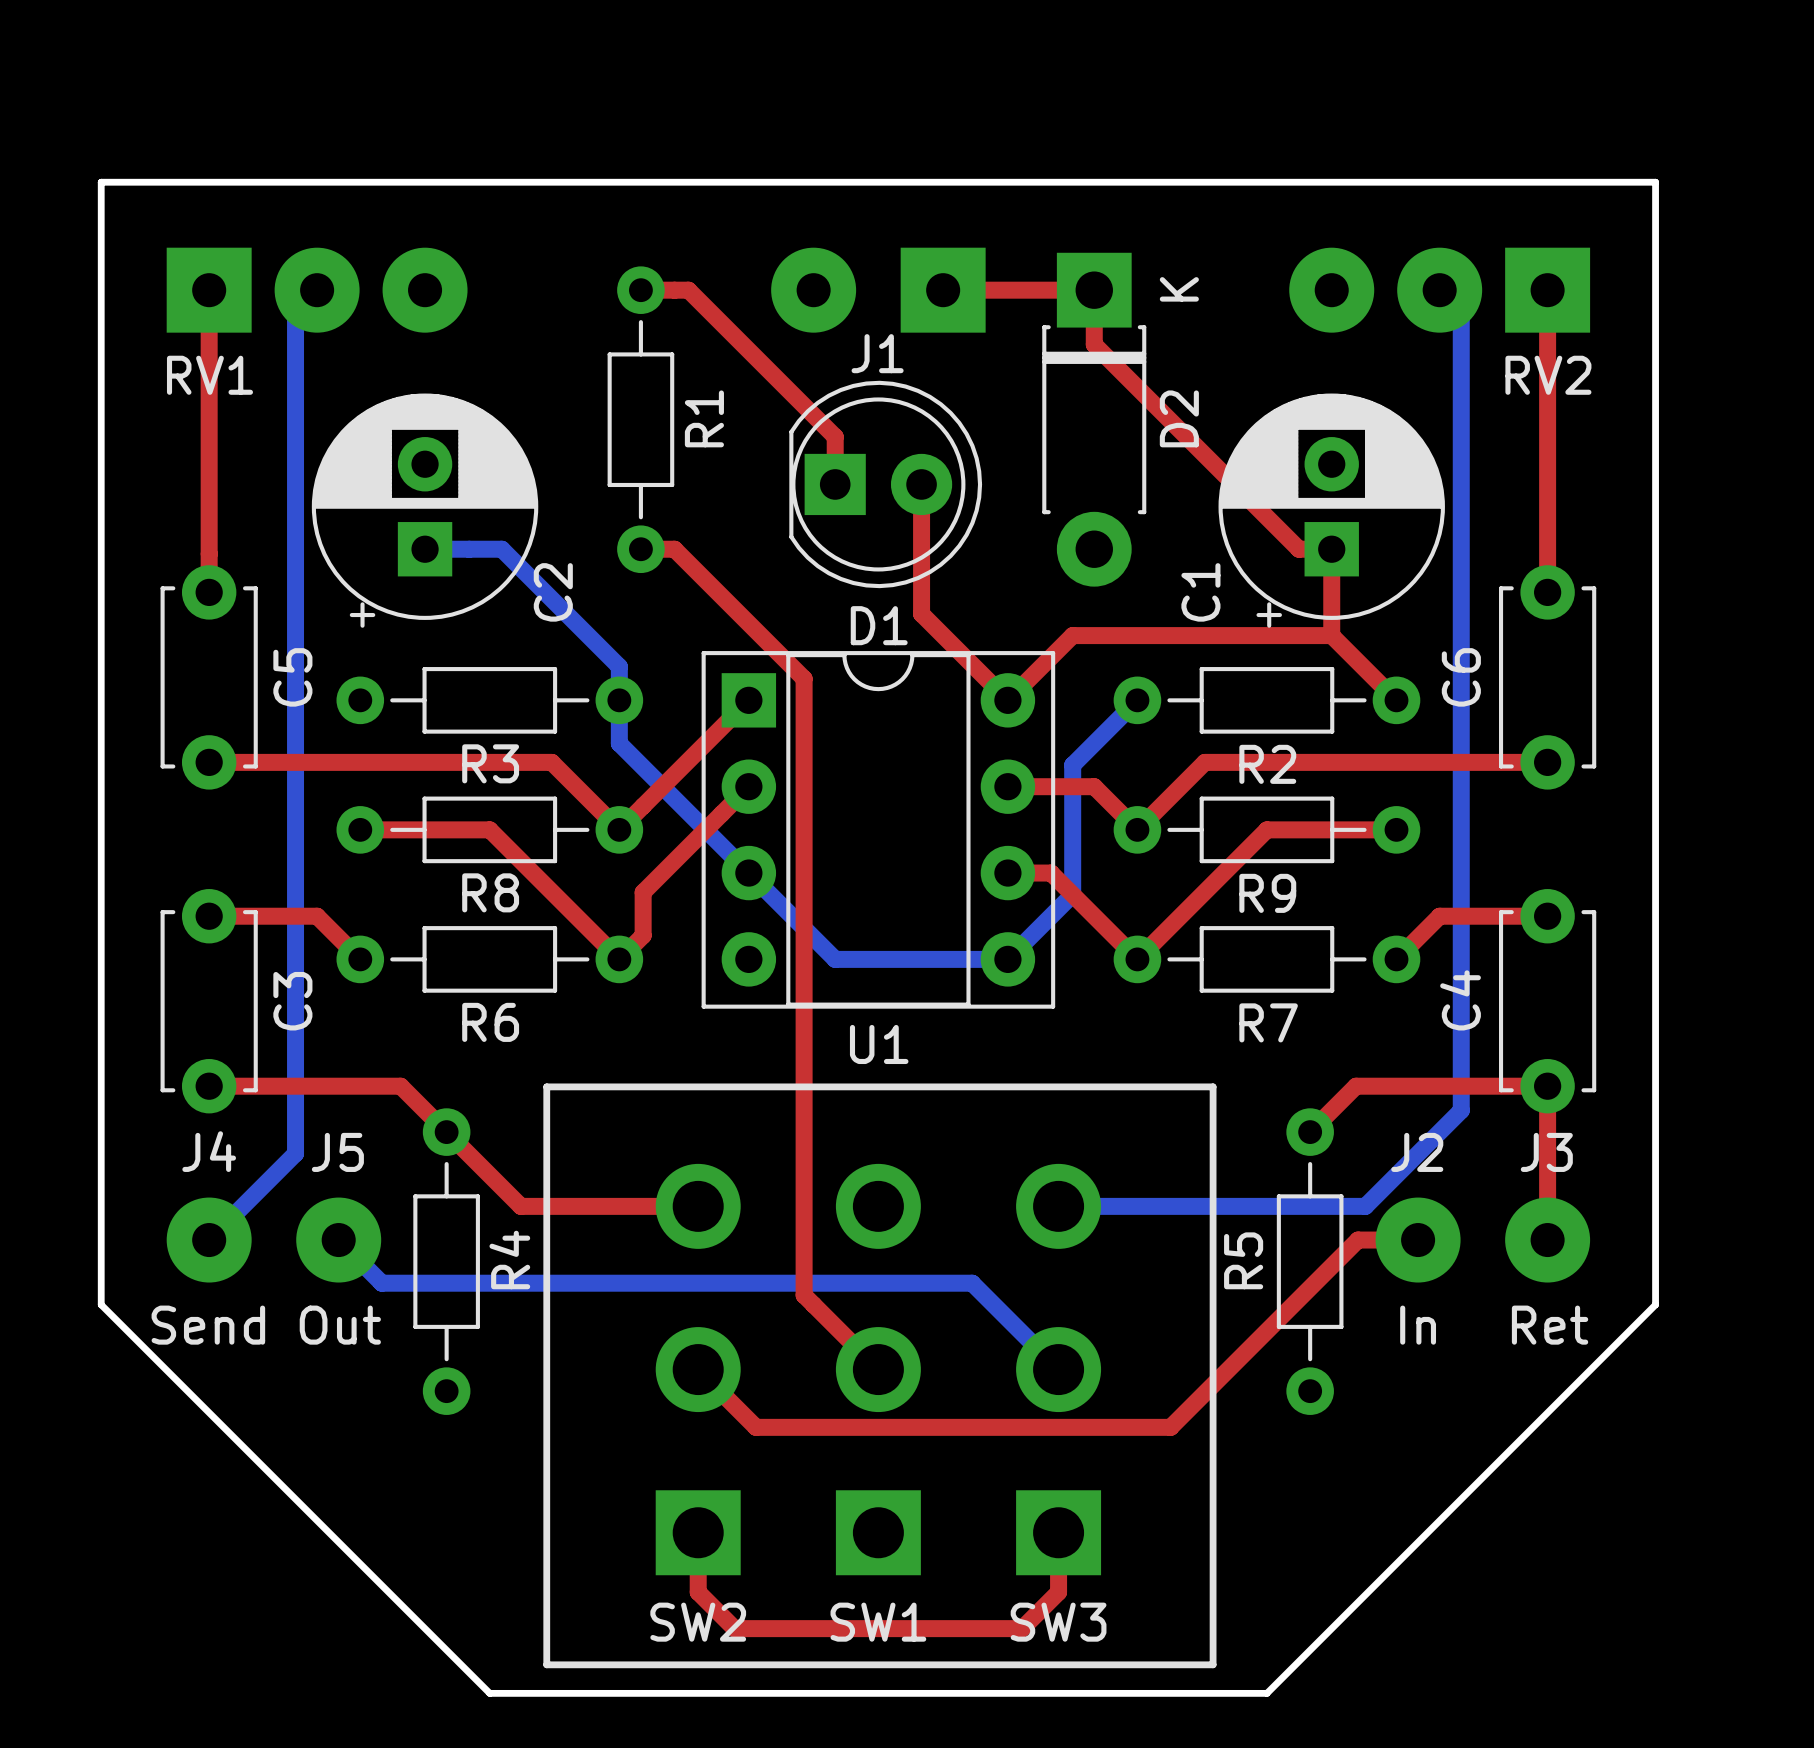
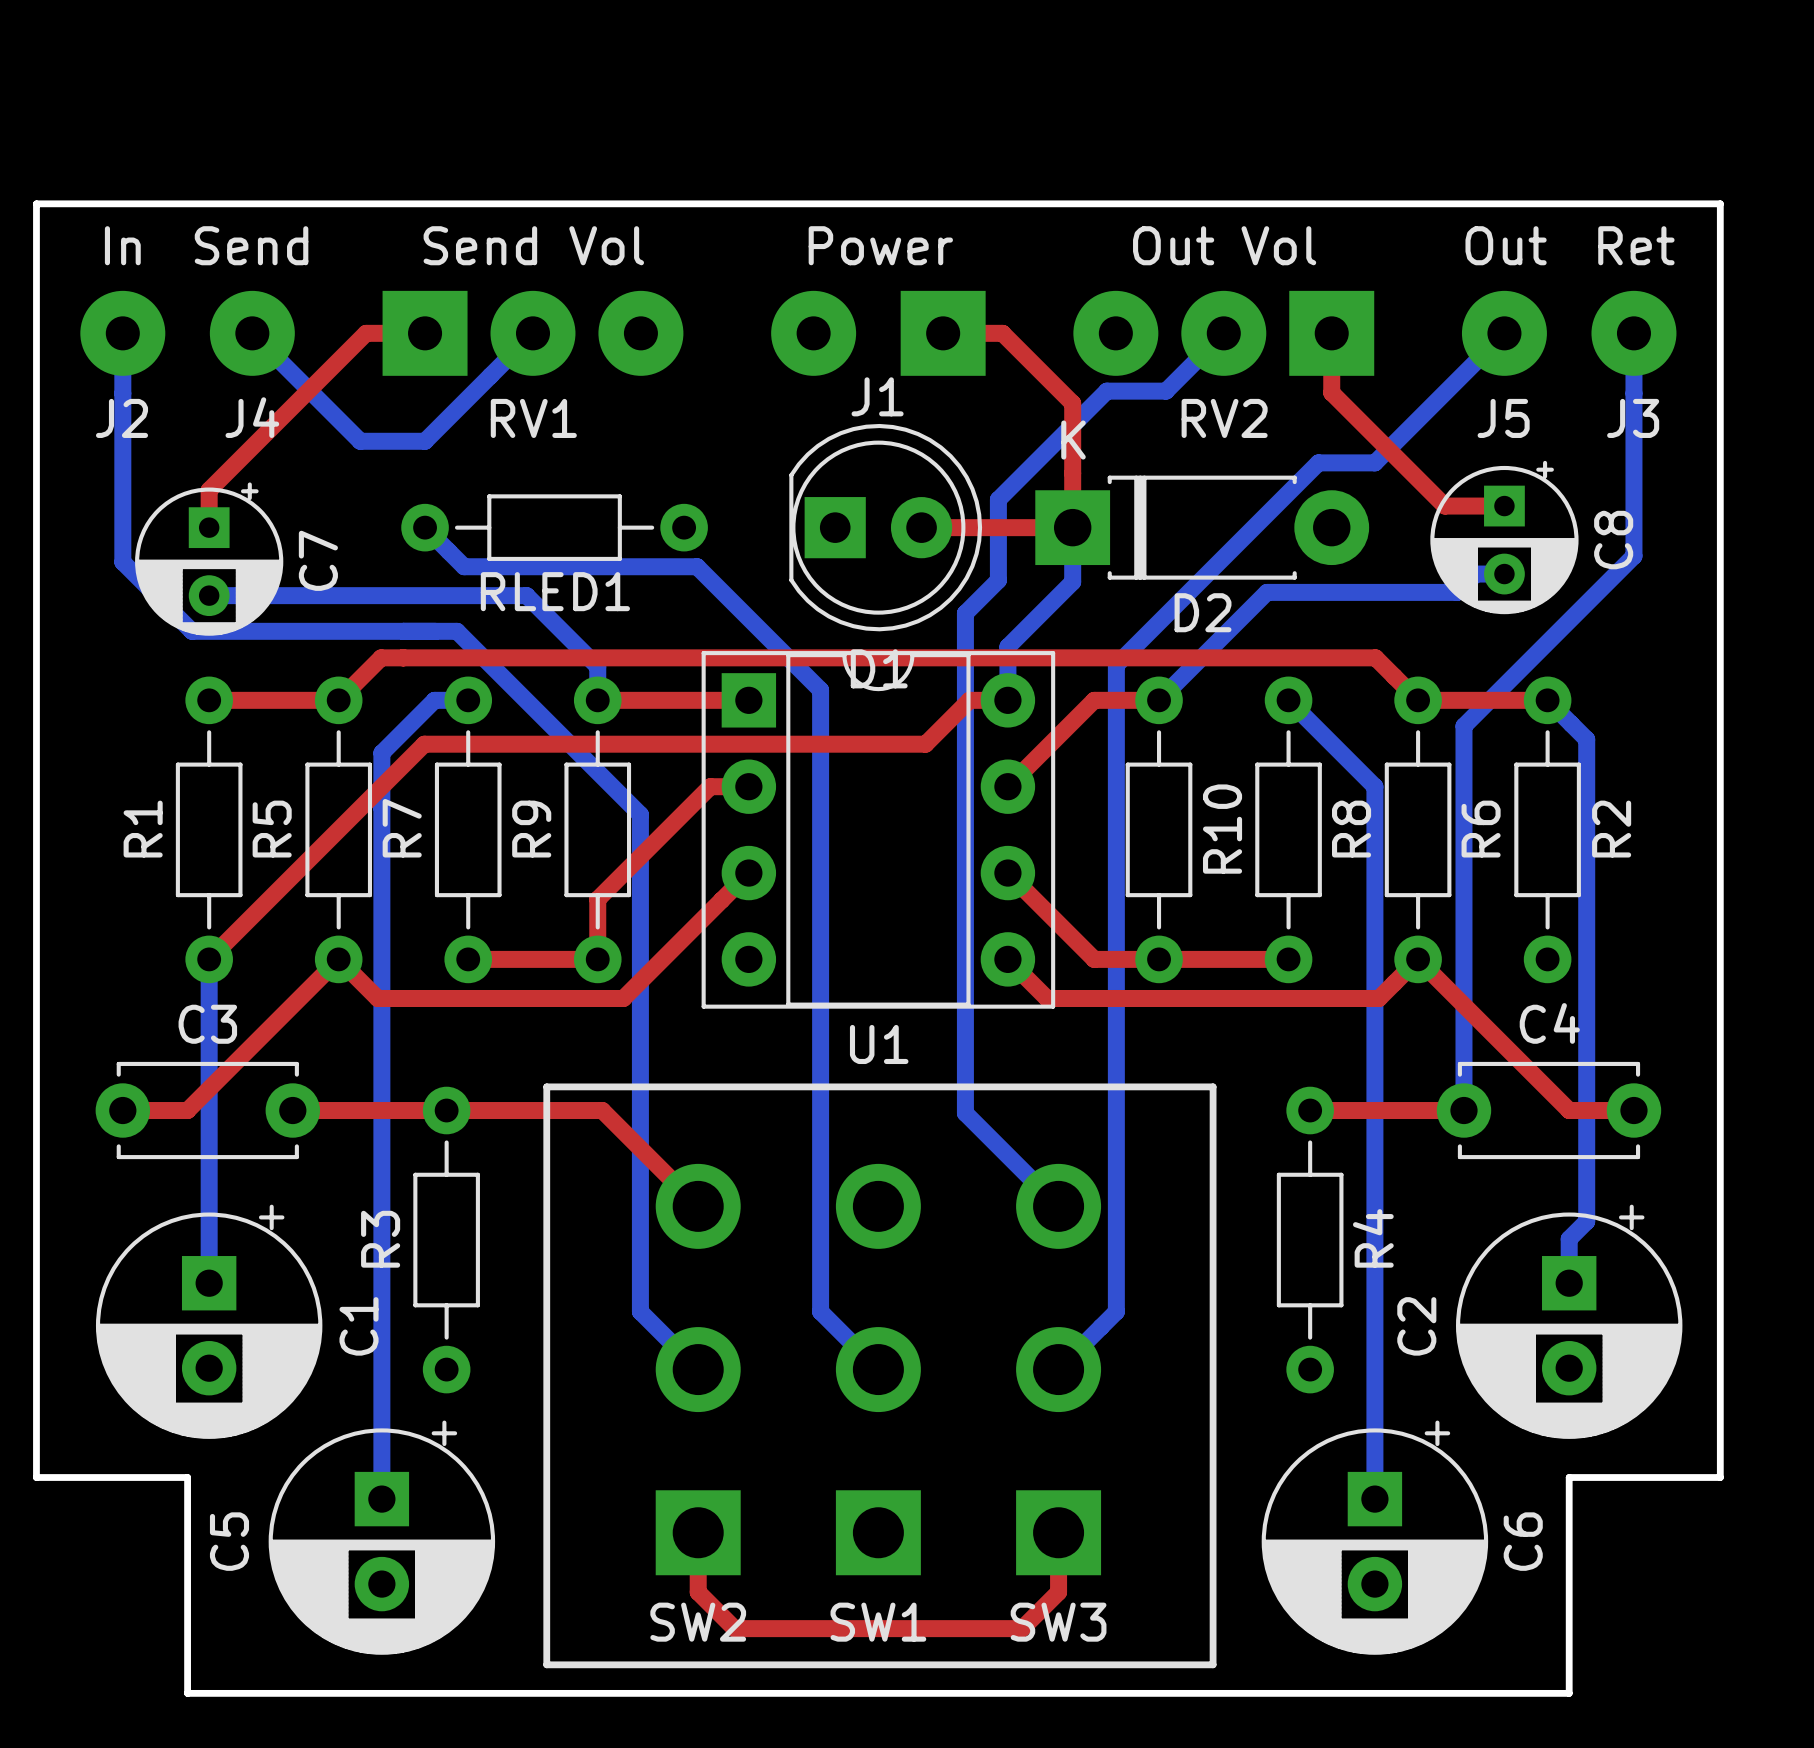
text: none -> In (122, 245)
text: none -> Send (251, 245)
text: none -> Send Vol (533, 245)
text: none -> Power (880, 245)
text: none -> Out Vol (1224, 245)
text: none -> Out (1506, 245)
text: none -> Ret (1636, 245)
top track: (209, 290) (209, 490) -> (425, 333) (366, 333) (209, 490)
bottom track: (317, 290) (295, 311) (295, 1153) (209, 1240) -> none
RV1 position: (317, 290) -> (532, 333)
top track: (640, 290) (688, 290) (835, 436) (835, 484) -> none
J1 position: (878, 290) -> (878, 333)
top track: (943, 290) (1094, 290) (1094, 344) (1298, 549) (1331, 549) (1331, 635) -> none
bottom track: (1439, 290) (1461, 311) (1461, 1110) (1365, 1206) (1058, 1206) -> (1223, 333) (1166, 391) (1106, 391) (998, 499) (998, 580) (965, 613) (965, 1113) (1058, 1206)
RV2 position: (1439, 290) -> (1223, 333)
top track: (1547, 290) (1547, 592) -> none
bottom track: none -> (122, 333) (122, 562) (192, 631) (457, 631) (640, 814) (640, 1311) (698, 1369)
bottom track: none -> (252, 333) (360, 441) (425, 441) (532, 333)
top track: none -> (943, 333) (1002, 333) (1072, 403) (1072, 527) (921, 527)
top track: none -> (1331, 333) (1331, 392) (1444, 506) (1504, 506)
bottom track: none -> (1633, 333) (1633, 556) (1463, 726) (1463, 1110)
RV1 name position: RV1 (209, 375) -> RV1 (533, 418)
RV2 name position: RV2 (1548, 375) -> RV2 (1224, 418)
R1 name position: R1 (704, 418) -> R1 (143, 829)
D2 name position: D2 (1179, 418) -> D2 (1203, 612)
R1 position: (640, 419) -> (209, 829)
D2 rotation: 0° (1094, 419) -> 90° counterclockwise (1202, 527)
D1 position: (885, 484) -> (885, 527)
top track: (921, 484) (921, 613) (1007, 700) (1072, 635) (1331, 635) -> none
C2 rotation: 0° (425, 510) -> 180° (1569, 1321)
C2 position: (425, 510) -> (1569, 1321)
C1 rotation: 0° (1331, 510) -> 180° (209, 1321)
C1 position: (1331, 510) -> (209, 1321)
top track: (209, 527) (209, 592) -> none
bottom track: none -> (425, 527) (464, 566) (697, 566) (820, 690) (820, 1311) (878, 1369)
RLED1: none -> (554, 527)
bottom track: none -> (1072, 527) (1072, 582) (1007, 646) (1007, 700)
C8: none -> (1504, 537)
bottom track: (425, 549) (501, 549) (619, 666) (619, 743) (835, 959) (1007, 959) (1072, 894) (1072, 765) (1137, 700) -> none
top track: (640, 549) (674, 549) (804, 678) (804, 1295) (878, 1369) -> none
C7: none -> (209, 559)
C5 footprint: [160, 565, 258, 790] -> [268, 1420, 496, 1655]
C6 footprint: [1499, 565, 1597, 790] -> [1261, 1420, 1489, 1655]
bottom track: none -> (1504, 574) (1475, 574) (1457, 592) (1266, 592) (1159, 700)
C2 name position: C2 (553, 592) -> C2 (1416, 1326)
C1 name position: C1 (1200, 592) -> C1 (359, 1326)
bottom track: none -> (209, 595) (526, 595) (597, 666) (597, 700)
top track: (1331, 635) (1396, 700) -> none
C5 name position: C5 (292, 677) -> C5 (229, 1541)
C6 name position: C6 (1461, 677) -> C6 (1523, 1541)
top track: none -> (209, 700) (338, 700) (381, 657) (1375, 657) (1418, 700) (1547, 700)
bottom track: none -> (468, 700) (434, 700) (381, 753) (381, 1499)
R3 rotation: 0° (489, 700) -> 90° clockwise (446, 1240)
R3 position: (489, 700) -> (446, 1240)
top track: (748, 700) (619, 829) (551, 762) (209, 762) -> (748, 700) (597, 700)
top track: none -> (1007, 700) (969, 700) (925, 744) (424, 744) (209, 959)
R2 rotation: 0° (1266, 700) -> 90° clockwise (1547, 829)
R2 position: (1266, 700) -> (1547, 829)
bottom track: none -> (1288, 700) (1374, 786) (1374, 1499)
bottom track: none -> (1547, 700) (1586, 739) (1586, 1221) (1569, 1239) (1569, 1283)
top track: (1547, 762) (1204, 762) (1137, 829) (1094, 786) (1007, 786) -> (1159, 700) (1094, 700) (1007, 786)
R2 name position: R2 (1267, 764) -> R2 (1611, 829)
top track: (748, 786) (643, 892) (643, 935) (619, 959) (489, 829) (360, 829) -> (748, 786) (710, 786) (597, 899) (597, 959) (468, 959)
R8 rotation: 0° (489, 829) -> 90° clockwise (1288, 829)
R8 position: (489, 829) -> (1288, 829)
R10: none -> (1159, 829)
R9 rotation: 0° (1266, 829) -> 90° clockwise (597, 829)
R9 position: (1266, 829) -> (597, 829)
top track: (1396, 829) (1266, 829) (1137, 959) (1051, 873) (1007, 873) -> (1288, 959) (1094, 959) (1007, 873)
top track: none -> (748, 873) (623, 998) (377, 998) (338, 959) (187, 1110) (122, 1110)
R8 name position: R8 (490, 892) -> R8 (1351, 829)
top track: (209, 916) (317, 916) (360, 959) -> none
top track: (1547, 916) (1439, 916) (1396, 959) -> none
bottom track: none -> (209, 959) (209, 1283)
R6 rotation: 0° (489, 959) -> 90° clockwise (1418, 829)
R6 position: (489, 959) -> (1418, 829)
top track: none -> (1007, 959) (1047, 998) (1378, 998) (1418, 959) (1569, 1110) (1633, 1110)
R7 rotation: 0° (1266, 959) -> 90° clockwise (468, 829)
R7 position: (1266, 959) -> (468, 829)
C3 rotation: 0° (209, 1001) -> 90° clockwise (207, 1110)
C3 name position: C3 (292, 1001) -> C3 (207, 1024)
C4 rotation: 0° (1547, 1001) -> 90° clockwise (1548, 1110)
R6 name position: R6 (490, 1022) -> R6 (1481, 829)
top track: (209, 1086) (400, 1086) (520, 1206) (698, 1206) -> (292, 1110) (602, 1110) (698, 1206)
top track: none -> (1310, 1110) (1463, 1110)
top track: (1310, 1132) (1356, 1086) (1547, 1086) (1547, 1240) -> none
J4 name position: J4 (209, 1151) -> J4 (252, 417)
J5 name position: J5 (337, 1152) -> J5 (1503, 418)
J2 name position: J2 (1417, 1152) -> J2 (122, 418)
J3 name position: J3 (1546, 1152) -> J3 (1633, 418)
J4 position: (209, 1240) -> (252, 333)
bottom track: (338, 1240) (381, 1283) (972, 1283) (1058, 1369) -> (1504, 333) (1374, 462) (1318, 462) (1116, 665) (1116, 1311) (1058, 1369)
J5 position: (338, 1240) -> (1504, 333)
top track: (1418, 1240) (1358, 1240) (1170, 1427) (756, 1427) (698, 1369) -> none
J2 position: (1418, 1240) -> (122, 333)
J3 position: (1547, 1240) -> (1633, 333)
R4 position: (446, 1261) -> (1310, 1240)
R5 position: (1310, 1261) -> (338, 829)
text: Send (208, 1325) -> none
text: Out (340, 1325) -> none
text: In (1418, 1325) -> none
text: Ret (1550, 1325) -> none
board edge: (489, 1693) (101, 1304) (101, 182) (1655, 182) (1655, 1304) (1266, 1693) -> (489, 1693) (187, 1693) (187, 1477) (36, 1477) (36, 203) (1720, 203) (1720, 1477) (1569, 1477) (1569, 1693) (1266, 1693)

